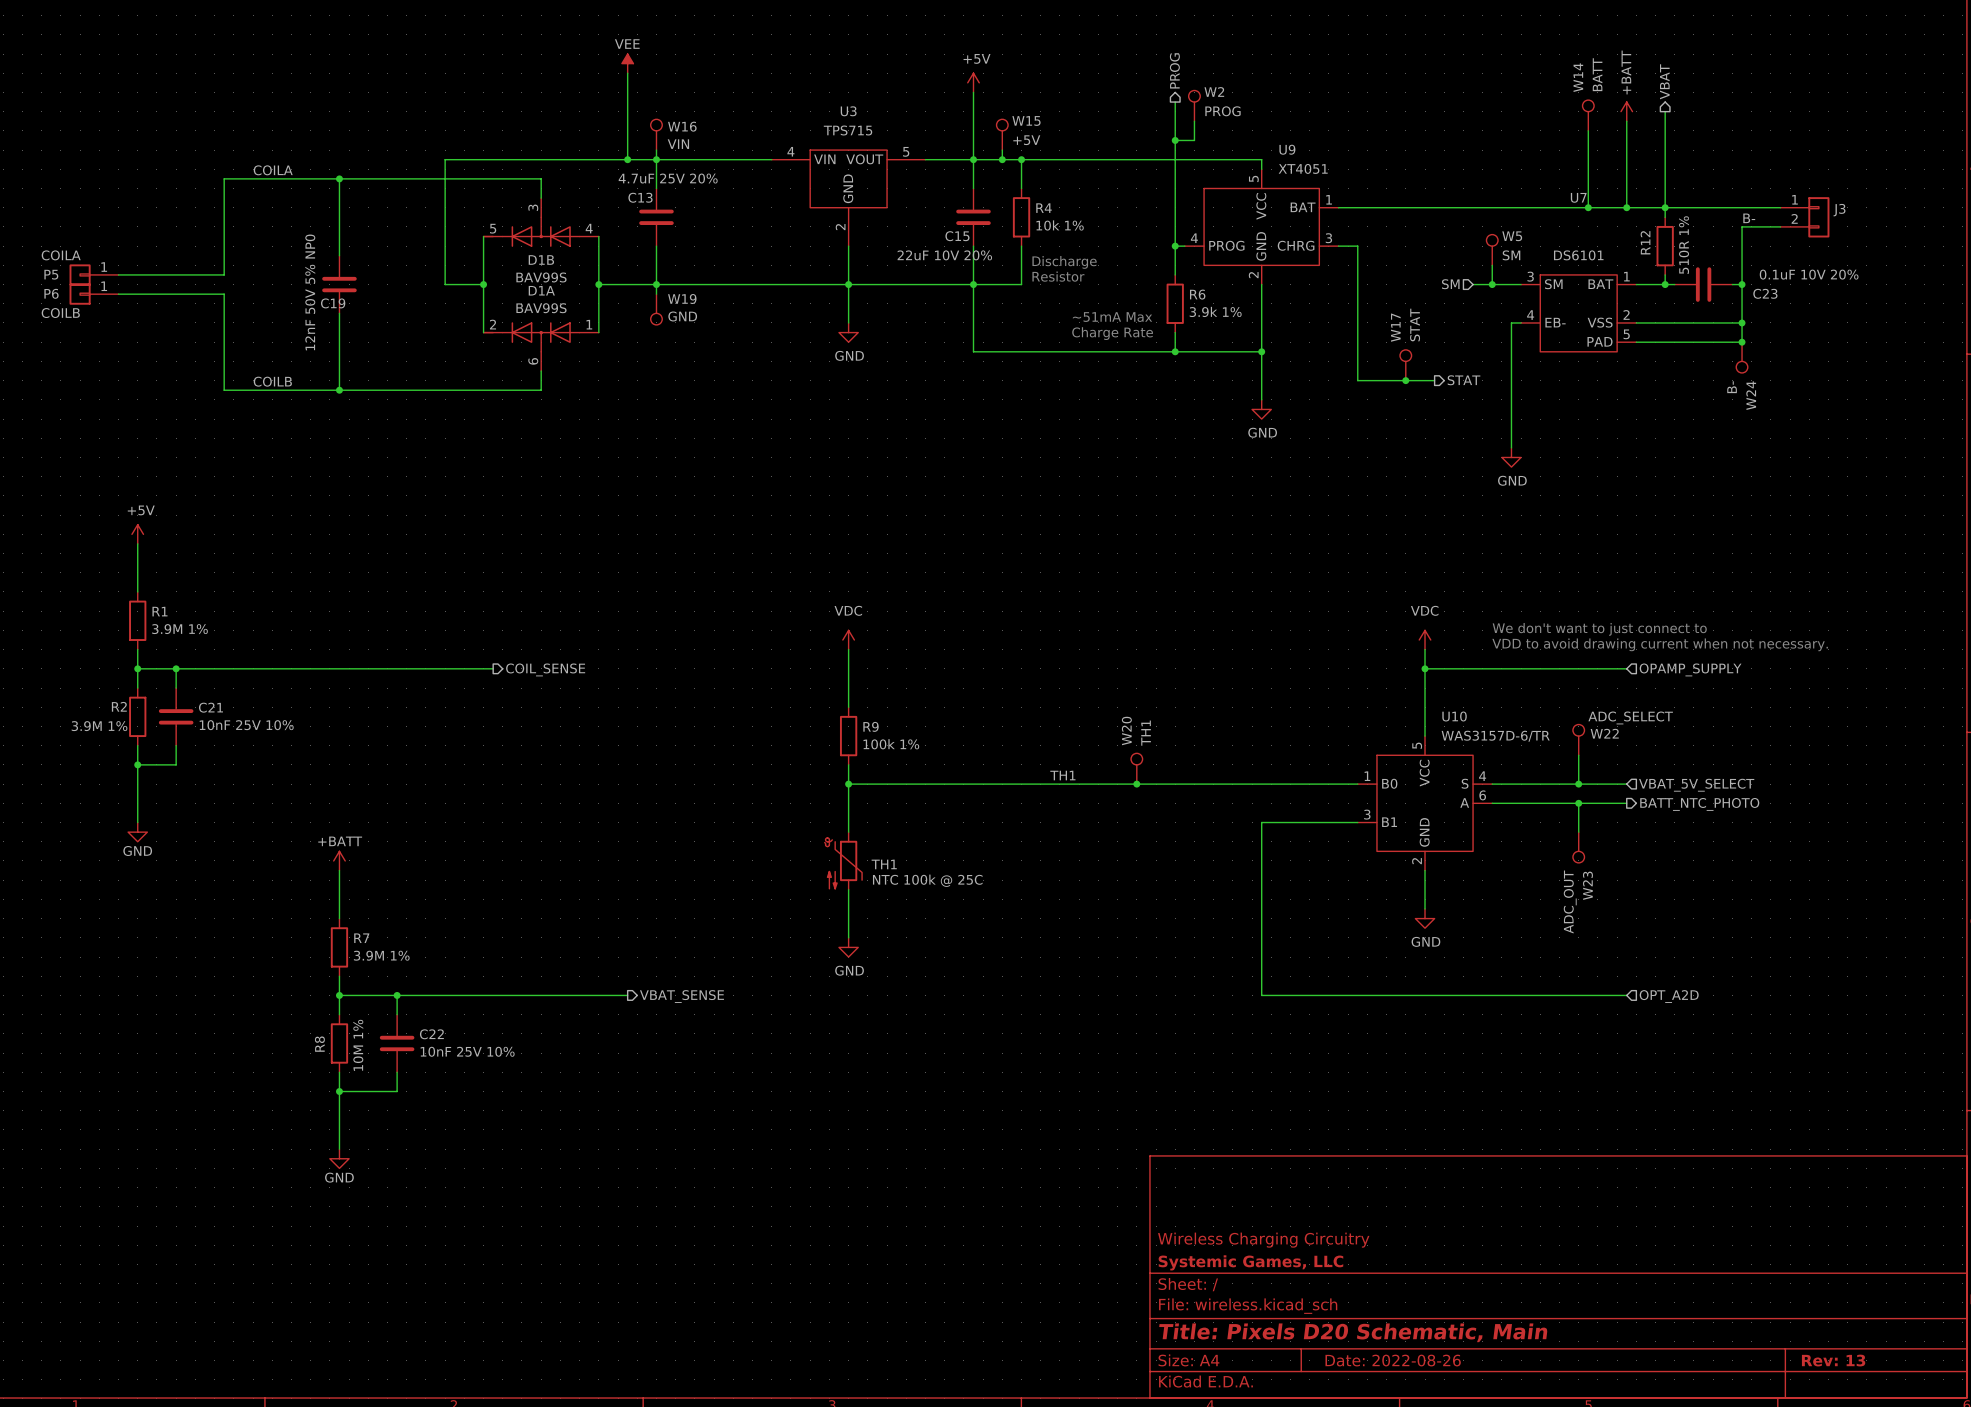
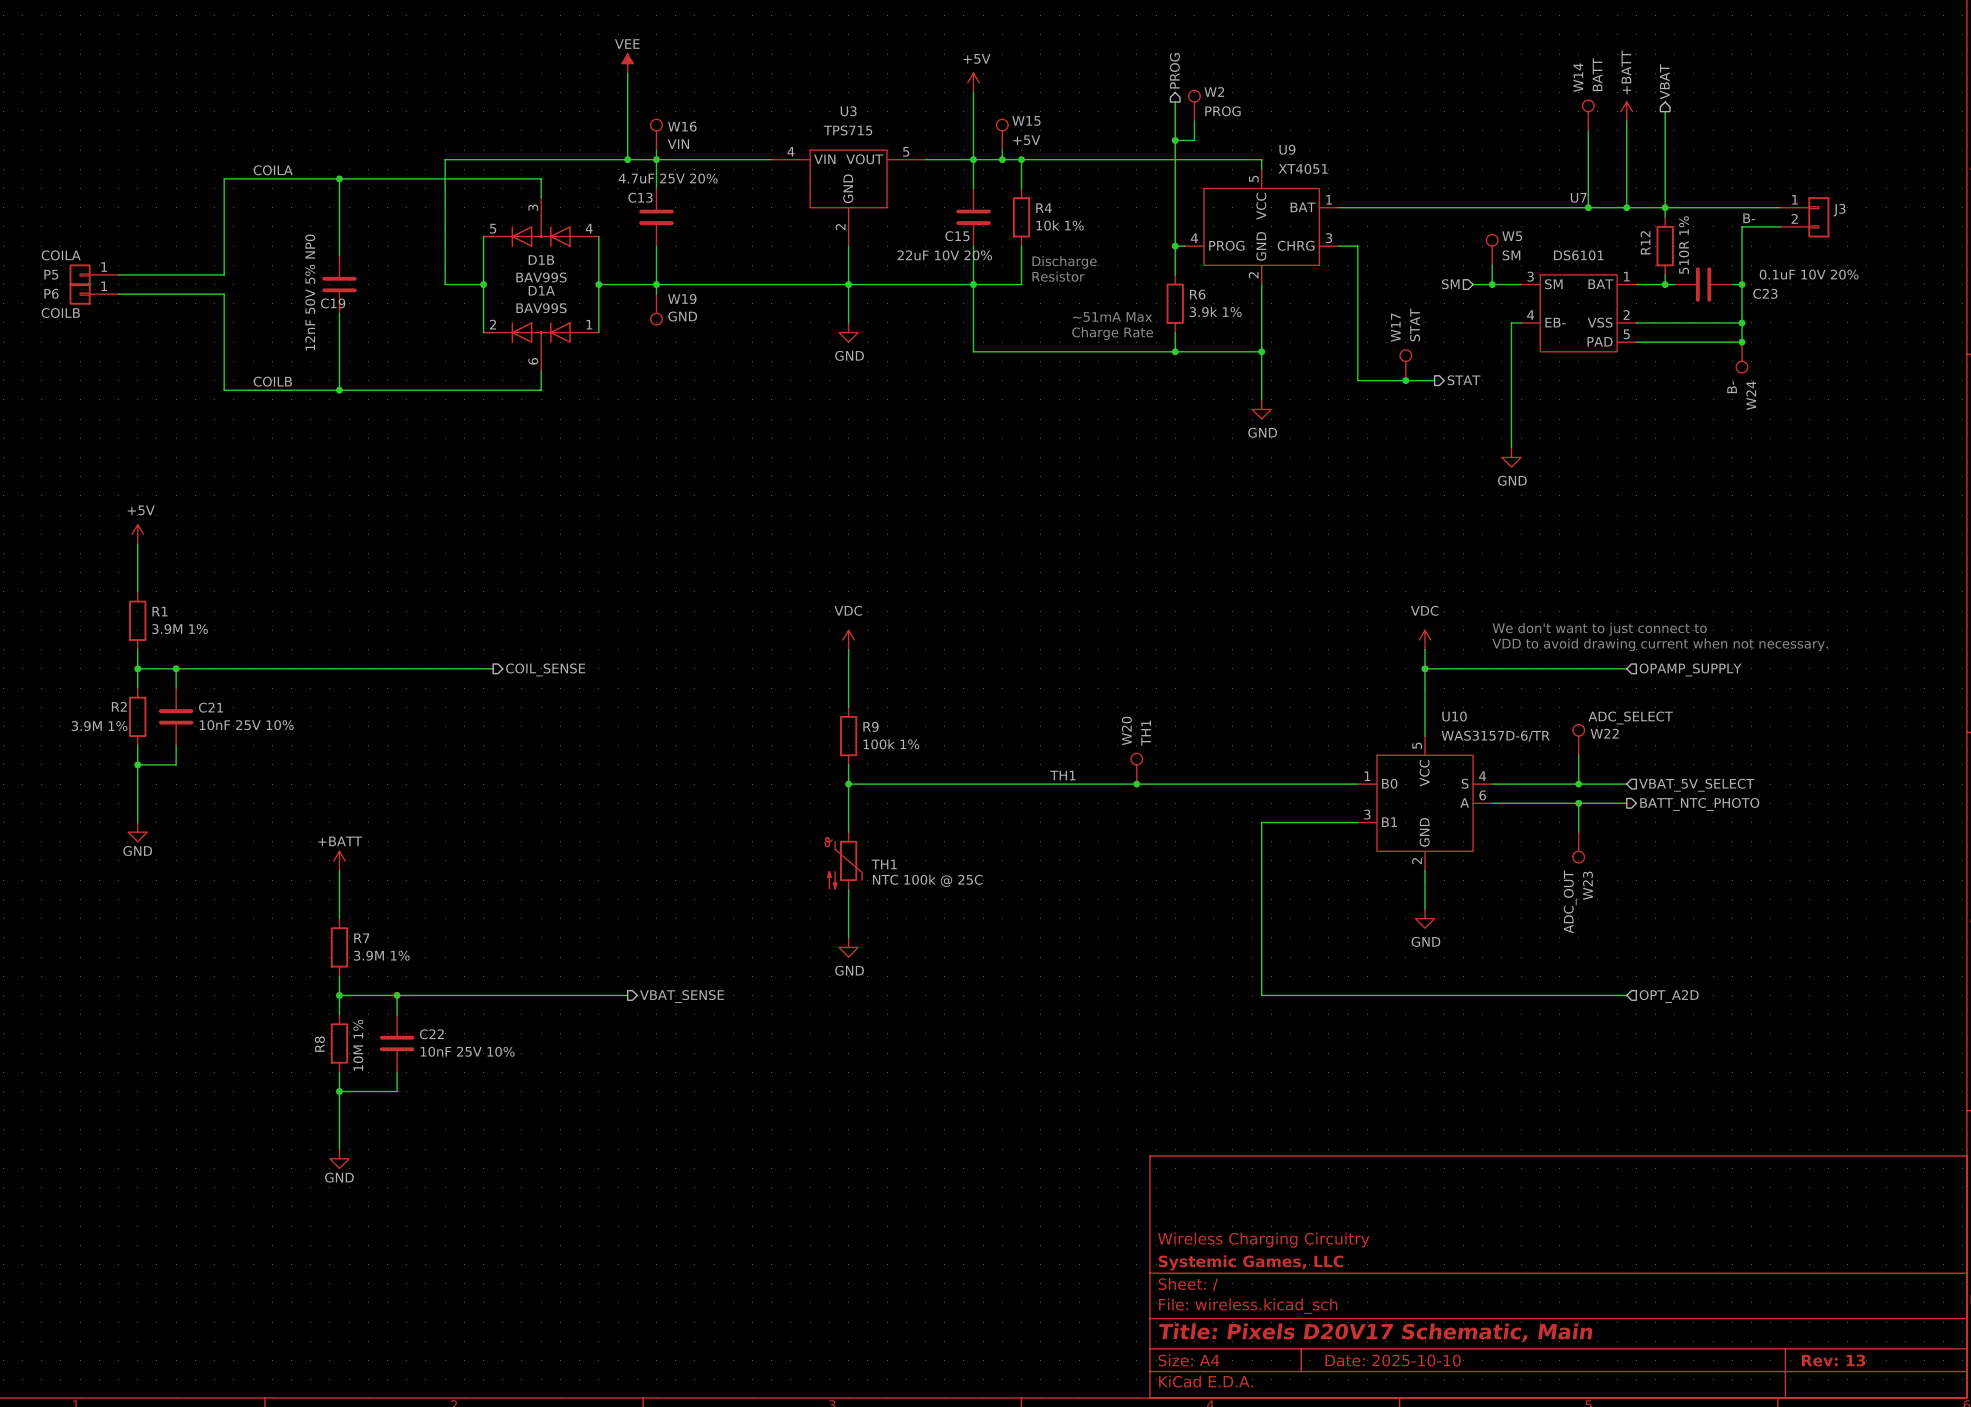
title block: Title: Pixels D20 Schematic, Main (1353, 1332) -> Title: Pixels D20V17 Schematic, Main (1375, 1332)
title block: Date: 2022-08-26 (1393, 1360) -> Date: 2025-10-10 (1393, 1360)

